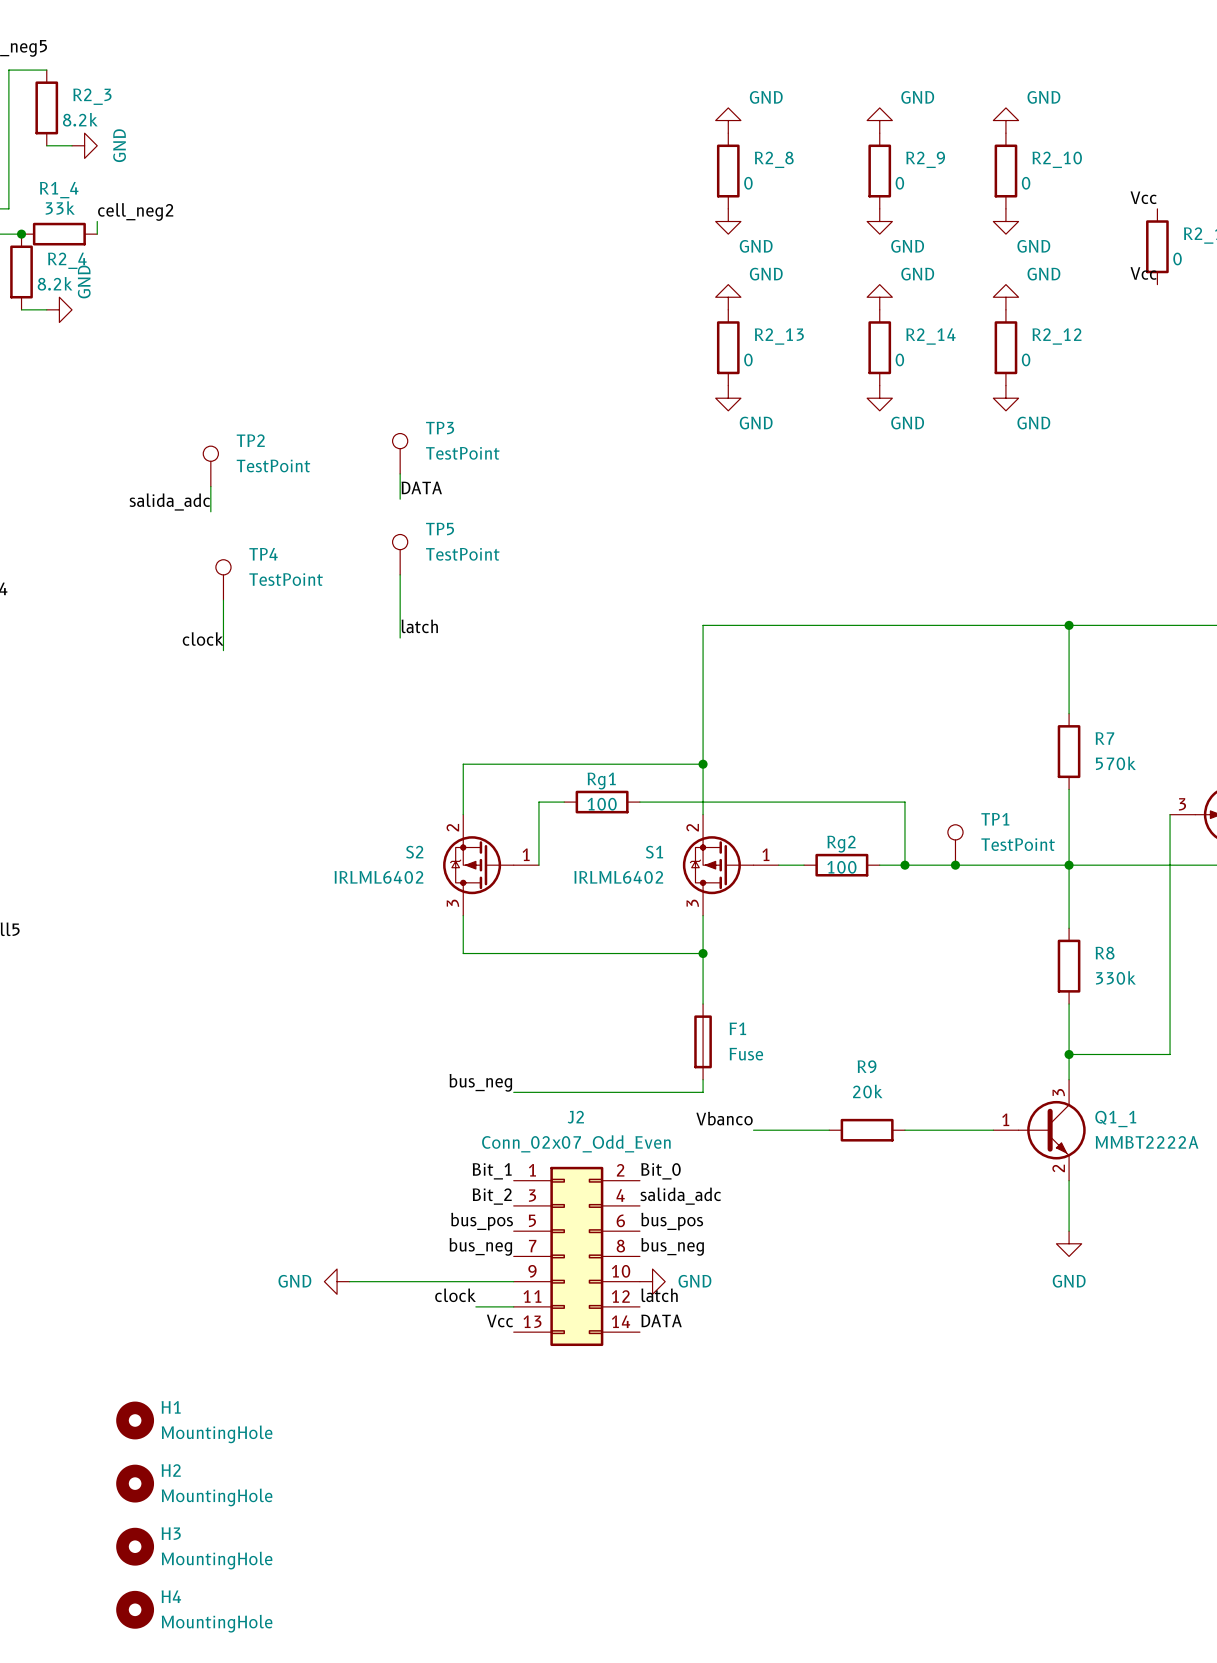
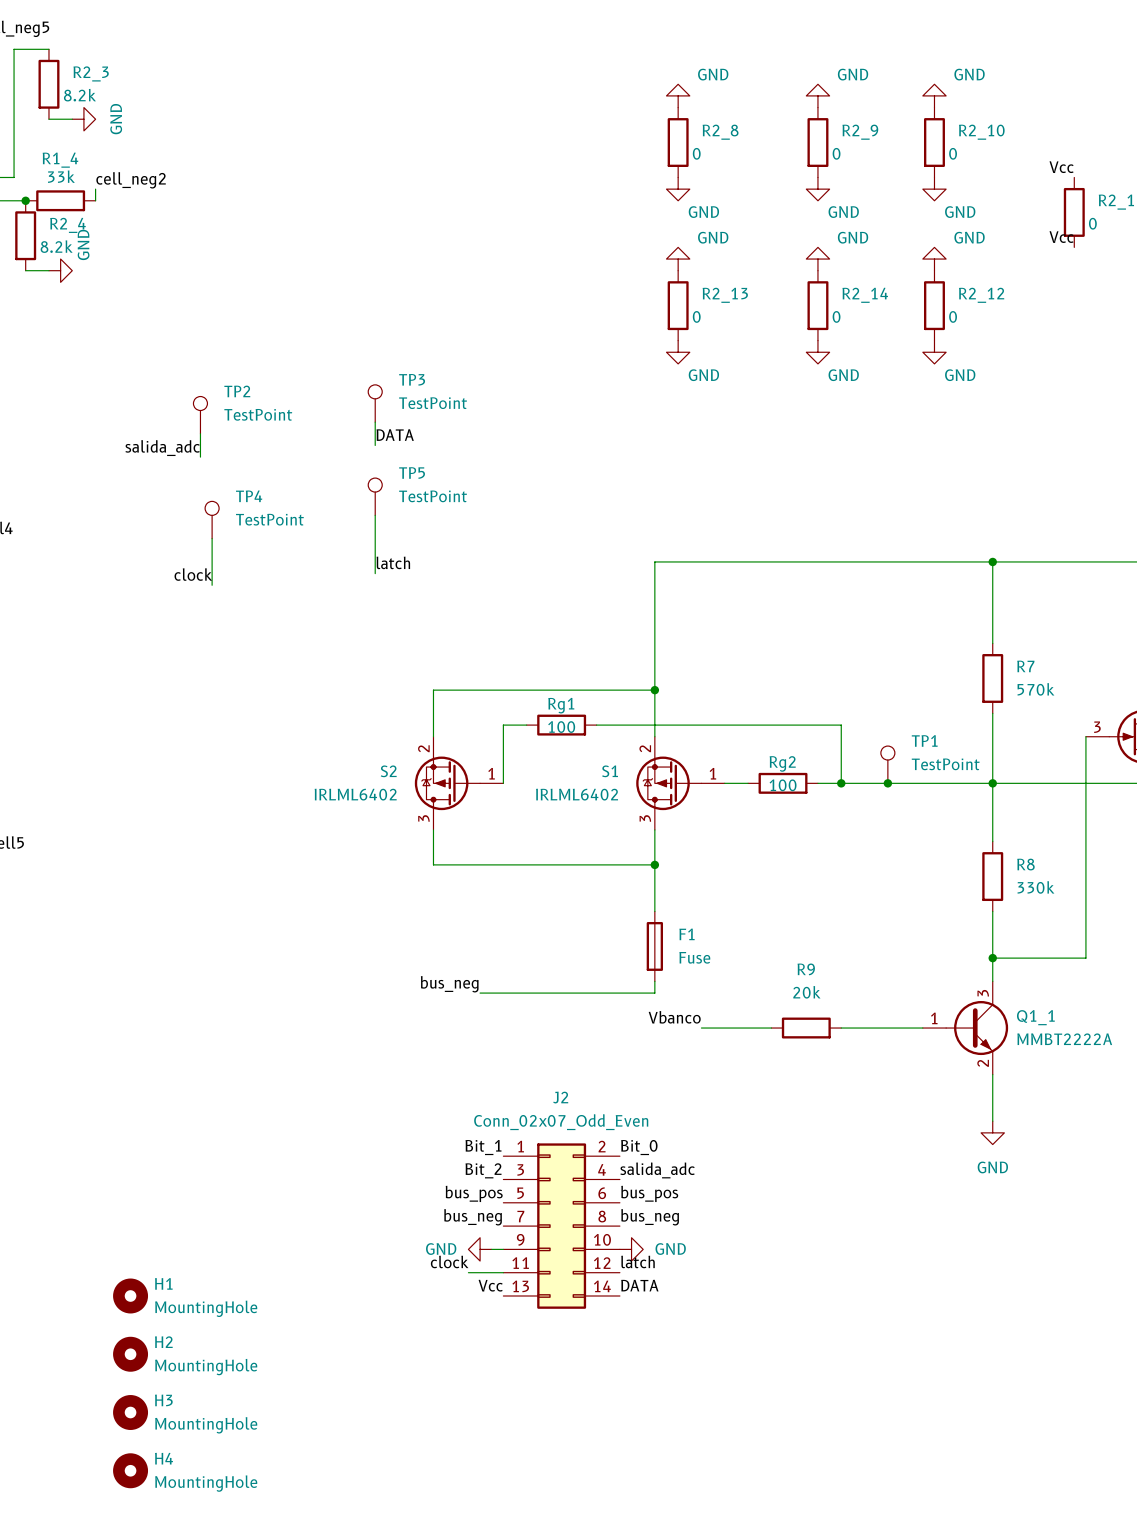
label position: Bit_1 (492, 1171) -> Bit_1 (483, 1147)
label position: Bit_0 (661, 1171) -> Bit_0 (639, 1147)
label position: Bit_2 (492, 1196) -> Bit_2 (483, 1170)
label position: salida_adc (680, 1196) -> salida_adc (657, 1170)
label: bus_pos (482, 1221) -> none
label: bus_pos (672, 1221) -> none
label: bus_neg (480, 1246) -> none
label: bus_neg (672, 1246) -> none
J2 position: (576, 1256) -> (561, 1226)
power symbol: GND (337, 1281) -> none
wire: (349, 1281) (513, 1281) -> none
power symbol: GND (652, 1281) -> none
label position: clock (455, 1295) -> clock (449, 1261)
label position: latch (659, 1295) -> latch (638, 1261)
wire: (475, 1306) (513, 1306) -> (468, 1272) (503, 1272)
label: none -> bus_pos (474, 1193)
label: none -> bus_pos (649, 1193)
label position: Vcc (499, 1320) -> Vcc (490, 1285)
label position: DATA (661, 1320) -> DATA (639, 1285)
label: none -> bus_neg (473, 1217)
label: none -> bus_neg (650, 1217)
power symbol: none -> GND (480, 1249)
wire: none -> (491, 1249) (503, 1249)
power symbol: none -> GND (631, 1249)

